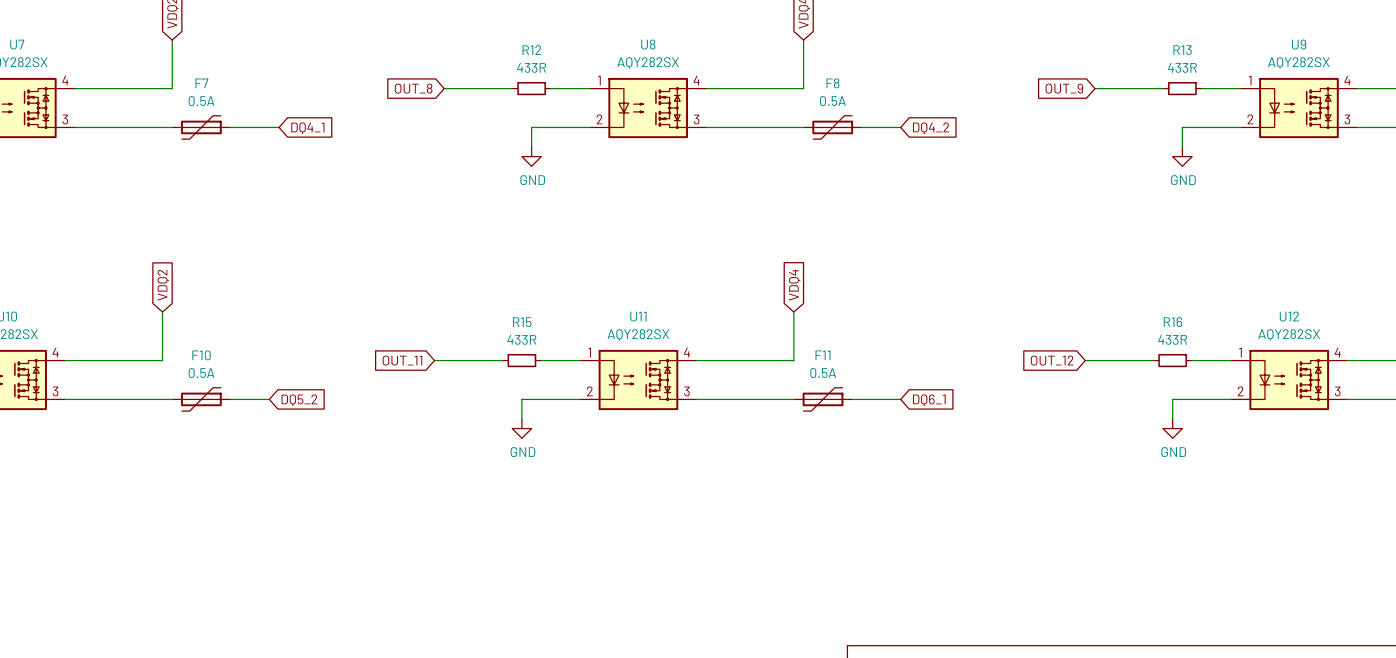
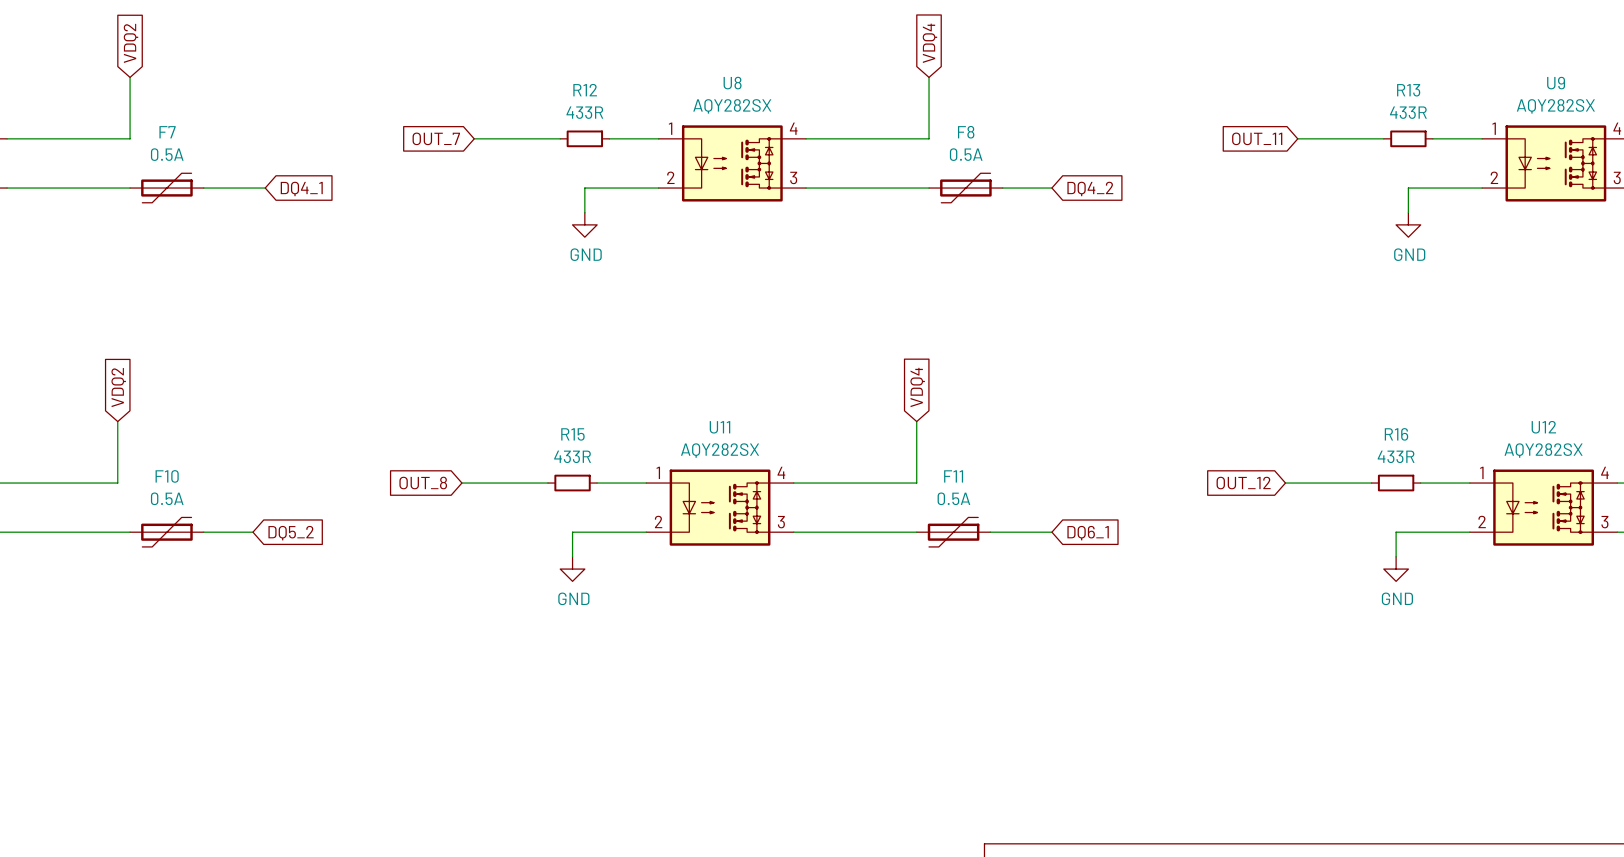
global label: OUT_8 (413, 88) -> OUT_7 (436, 138)
global label: OUT_9 (1064, 88) -> OUT_11 (1257, 138)
global label: OUT_11 (402, 360) -> OUT_8 (423, 483)

